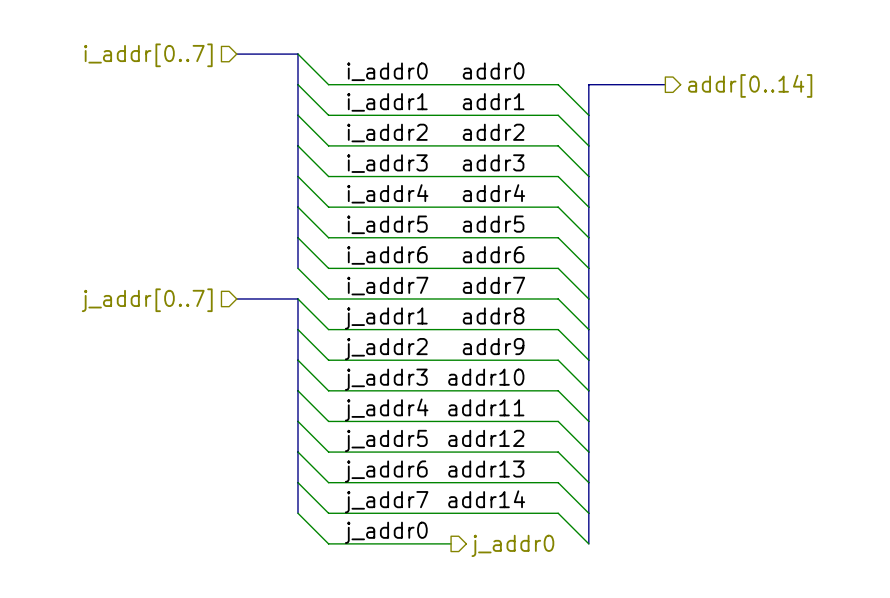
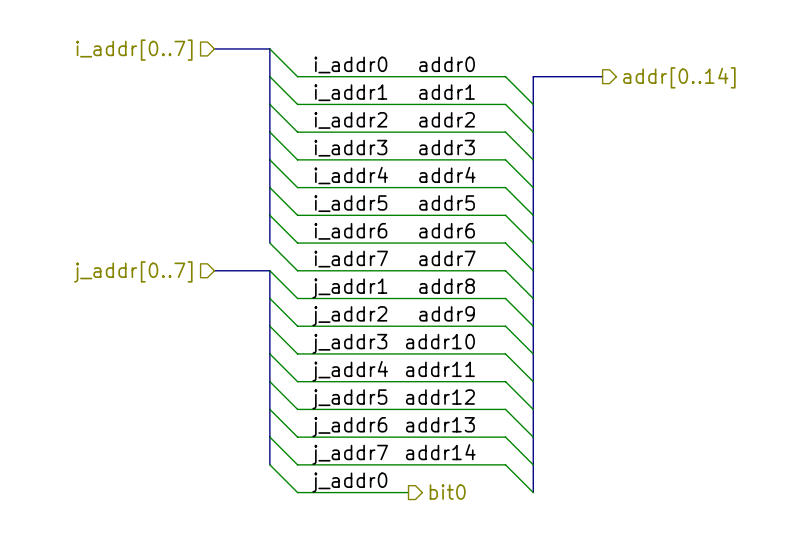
hierarchical label: j_addr0 (512, 545) -> bit0 (447, 492)

